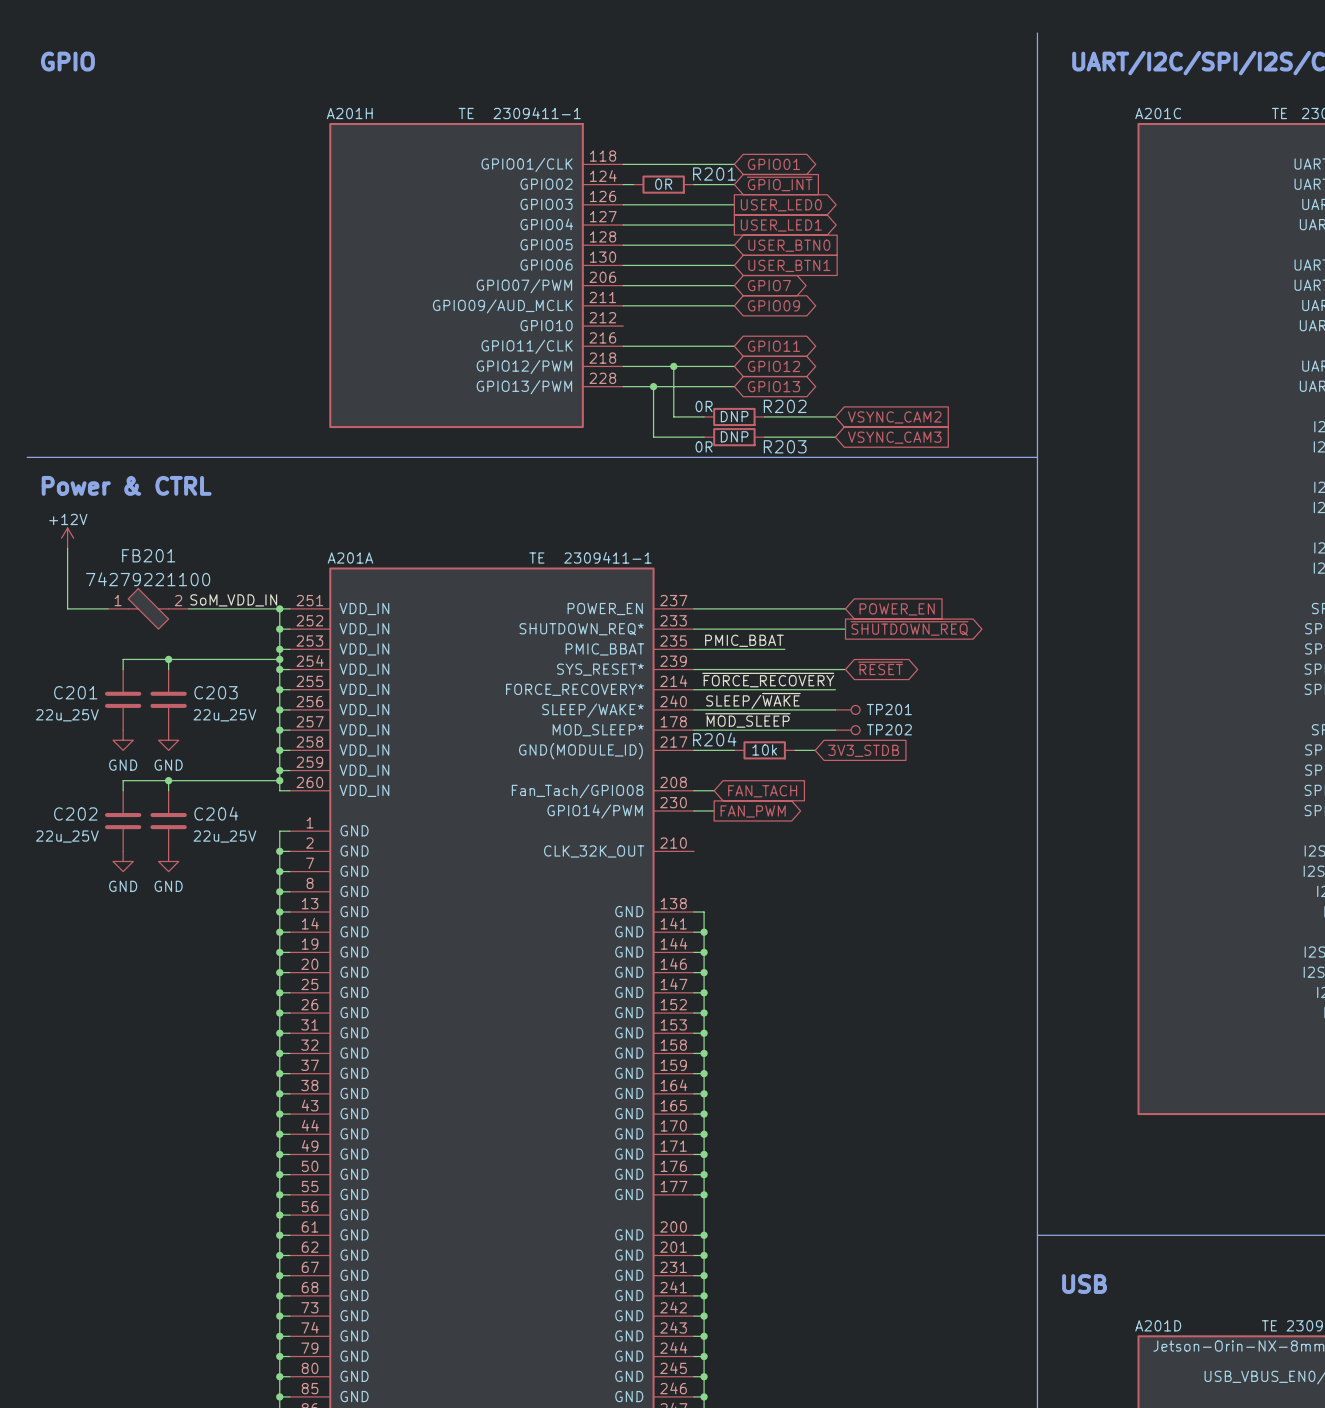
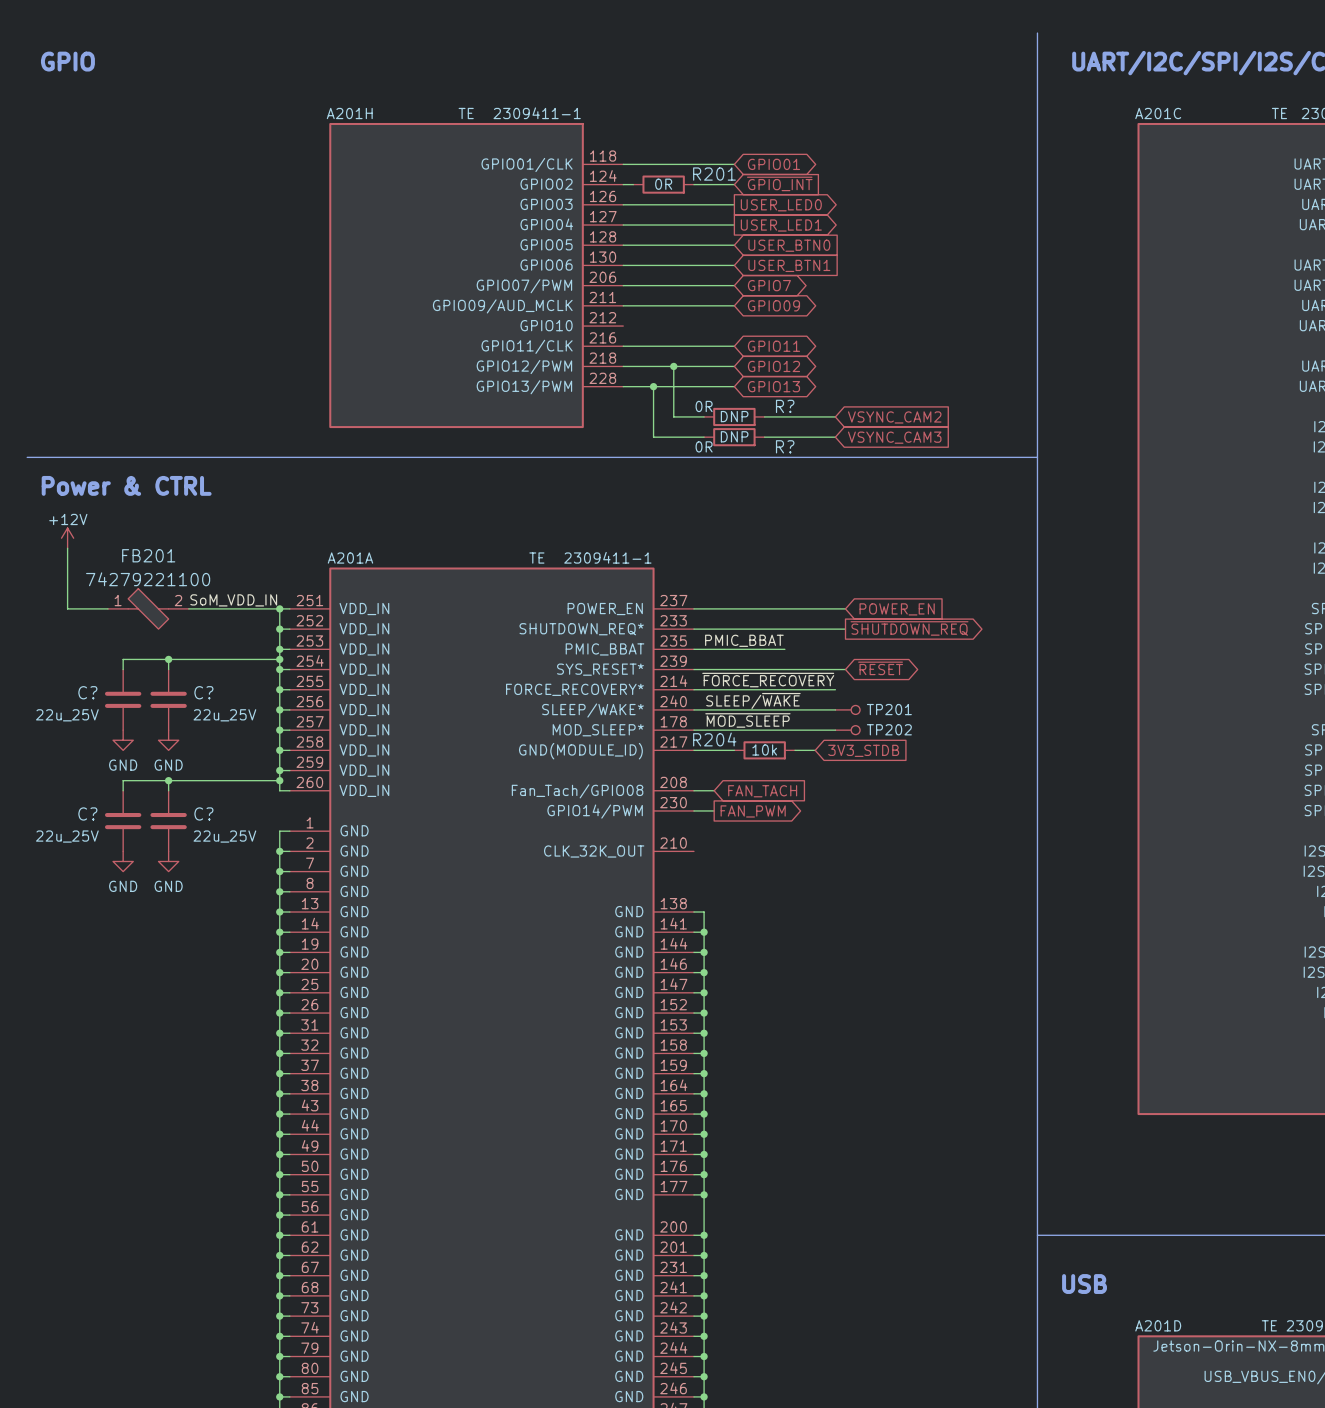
R202 name: R202 (785, 406) -> R? (785, 406)
R203 name: R203 (785, 446) -> R? (785, 446)
C201 name: C201 (75, 692) -> C? (87, 692)
C203 name: C203 (216, 692) -> C? (203, 692)
C202 name: C202 (75, 813) -> C? (87, 813)
C204 name: C204 (216, 813) -> C? (203, 813)

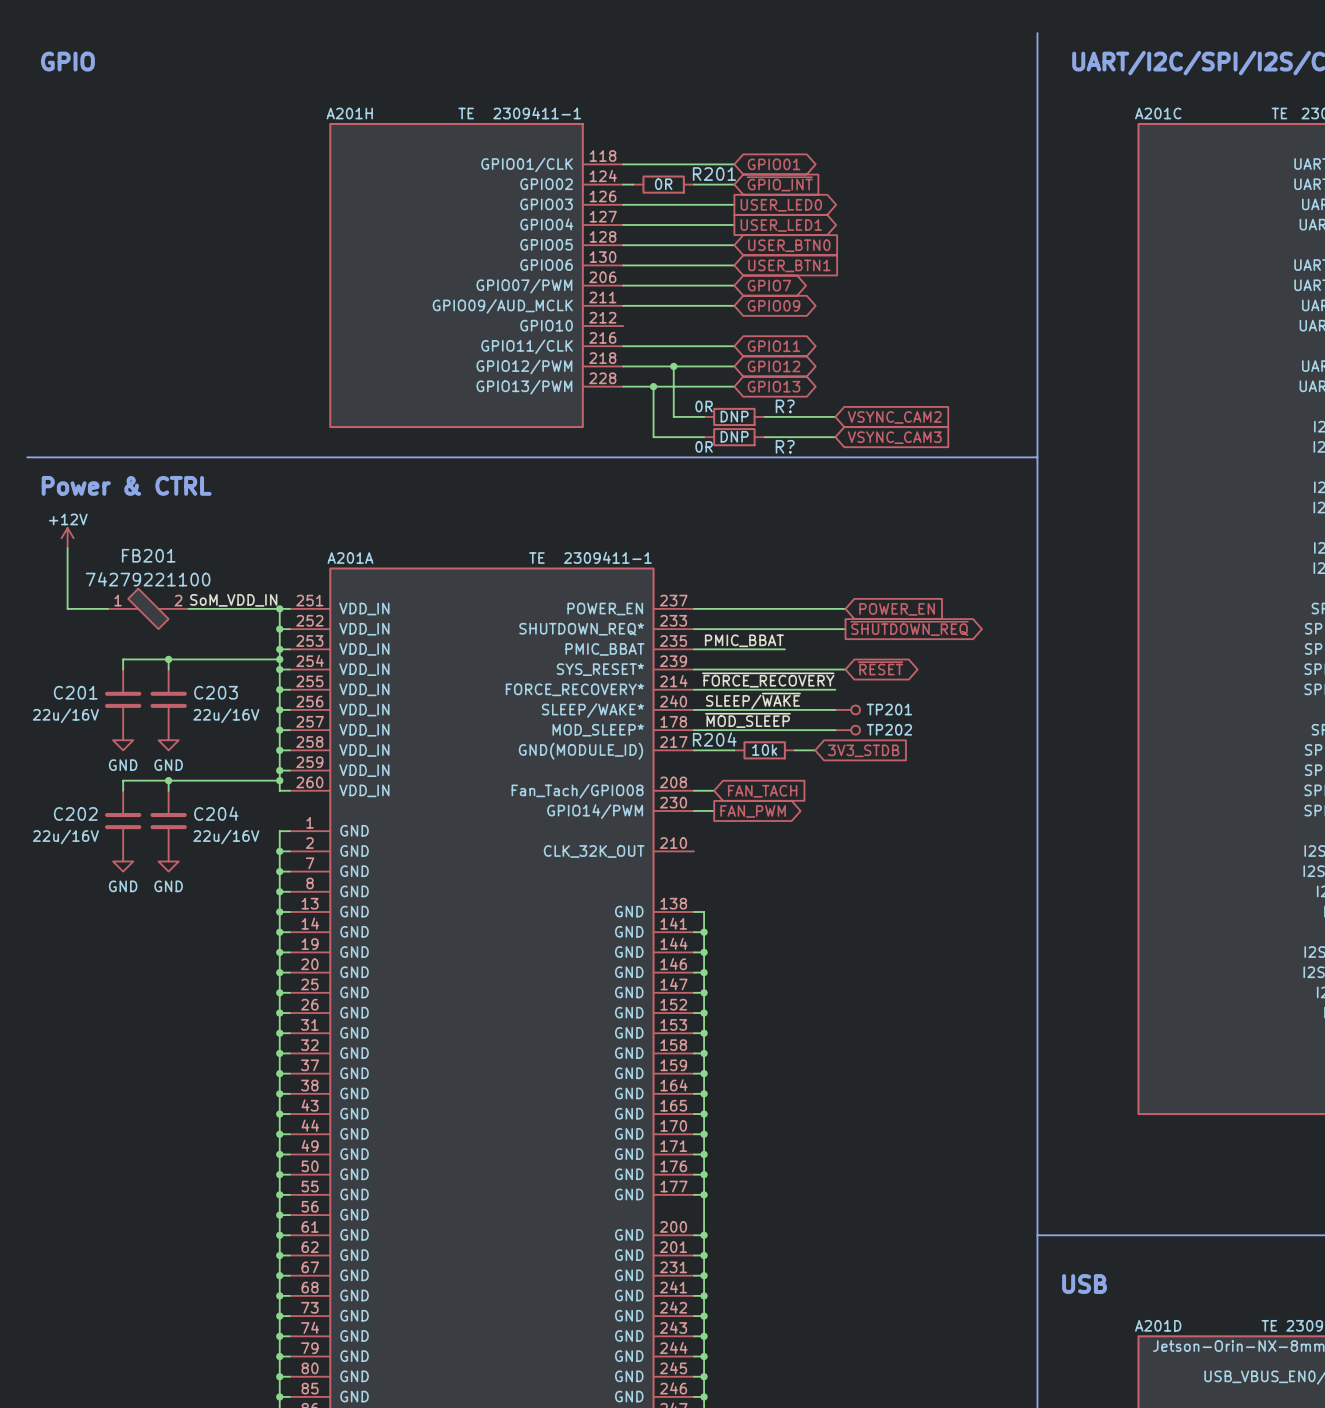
C? name: C? (87, 692) -> C201 (75, 692)
C? name: C? (203, 692) -> C203 (216, 692)
C? text: 22u_25V (67, 715) -> 22u/16V (65, 715)
C? text: 22u_25V (224, 715) -> 22u/16V (226, 715)
C? name: C? (87, 813) -> C202 (75, 813)
C? name: C? (203, 813) -> C204 (216, 813)
C? text: 22u_25V (67, 836) -> 22u/16V (65, 837)
C? text: 22u_25V (224, 836) -> 22u/16V (226, 837)

